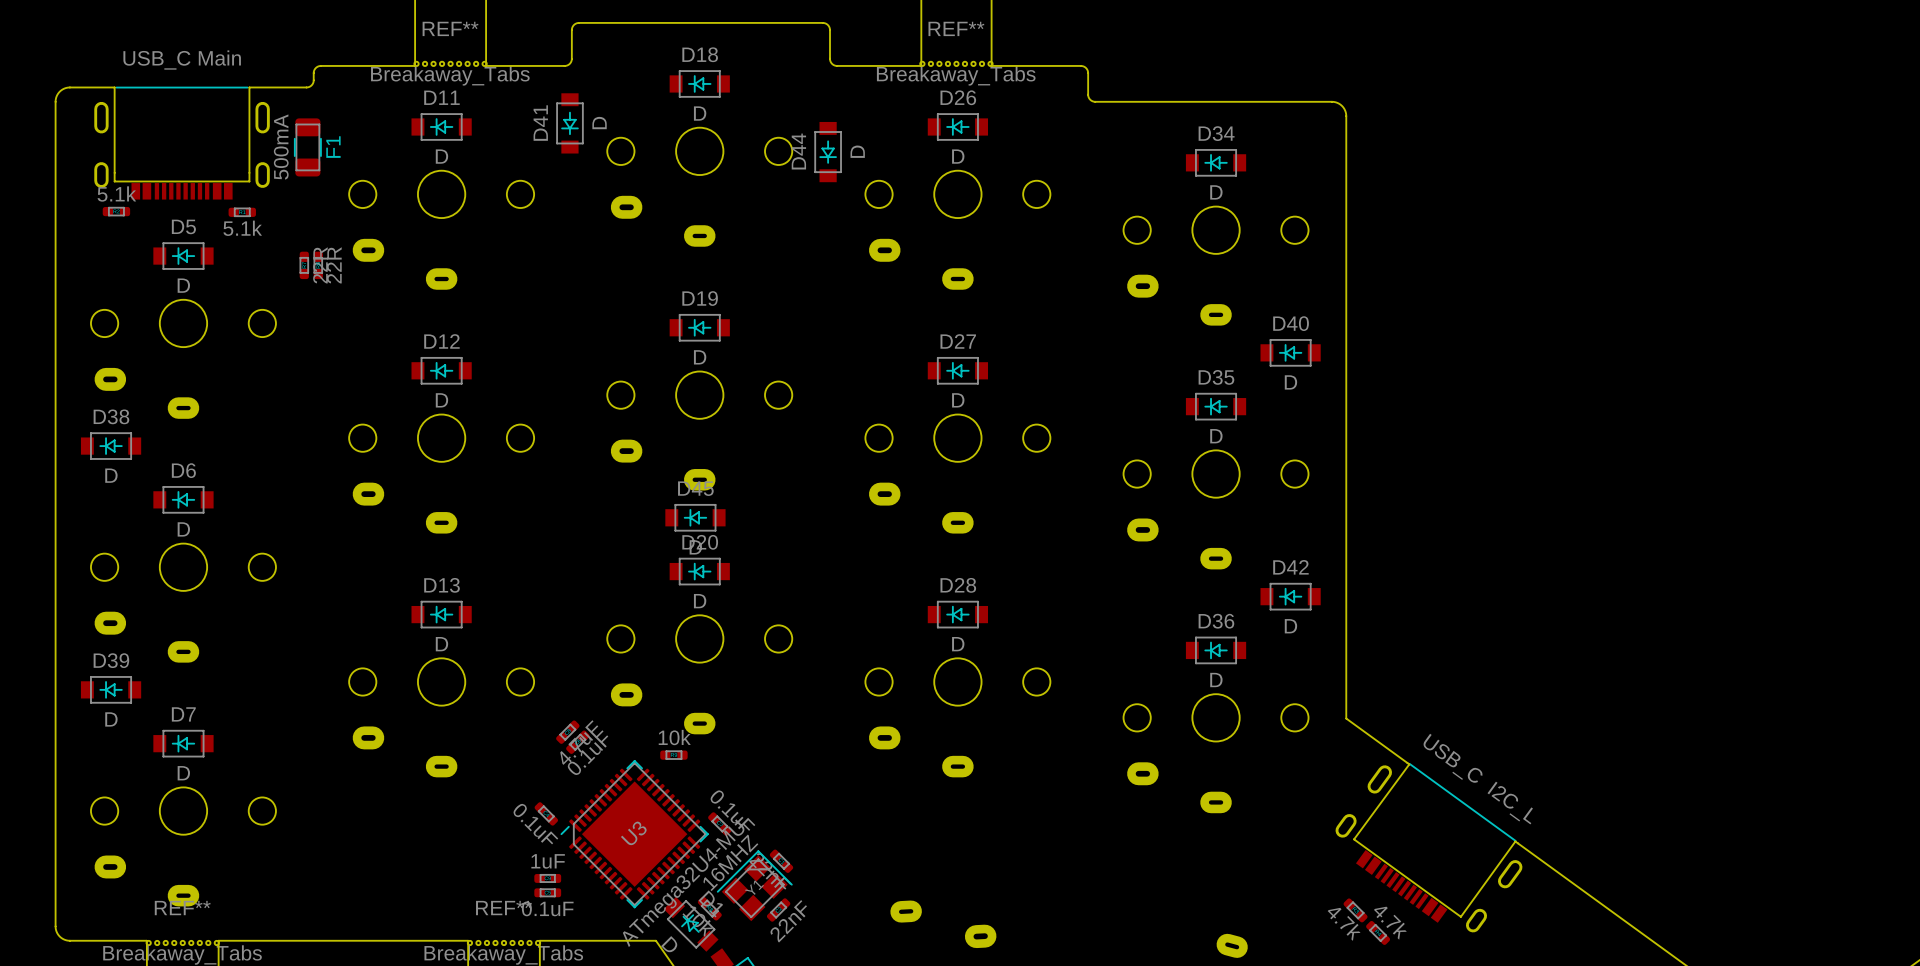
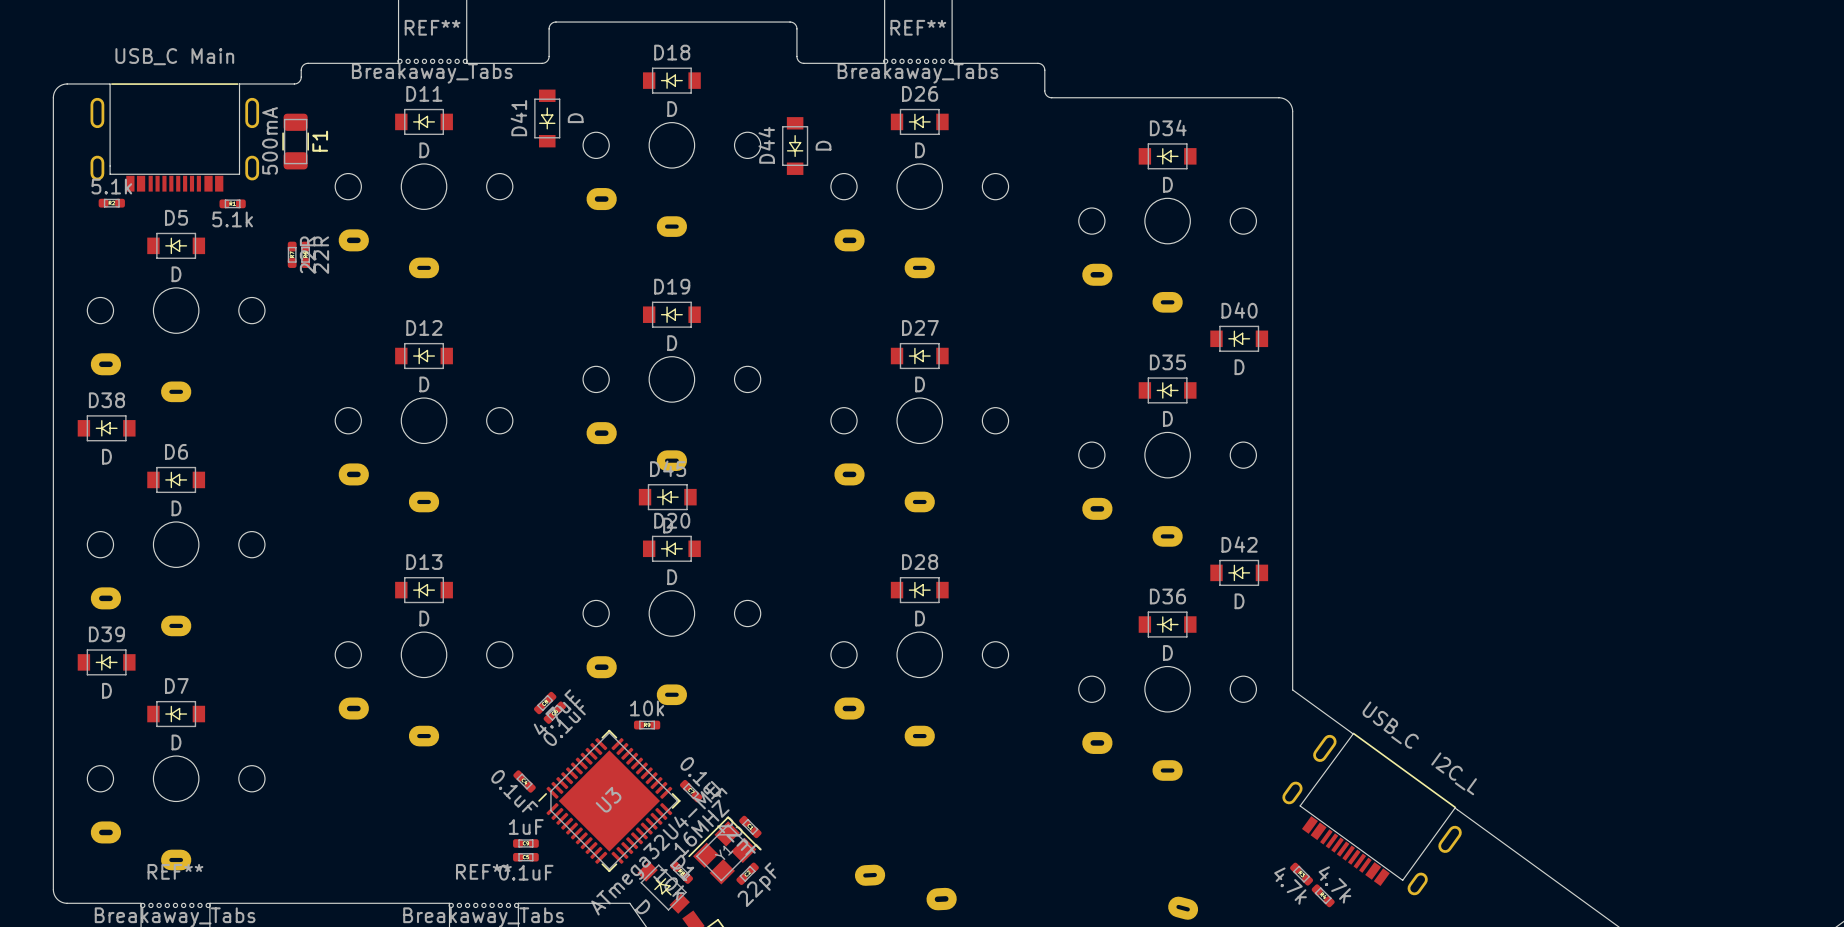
part value: 22nF (788, 921) -> 22pF (756, 884)

